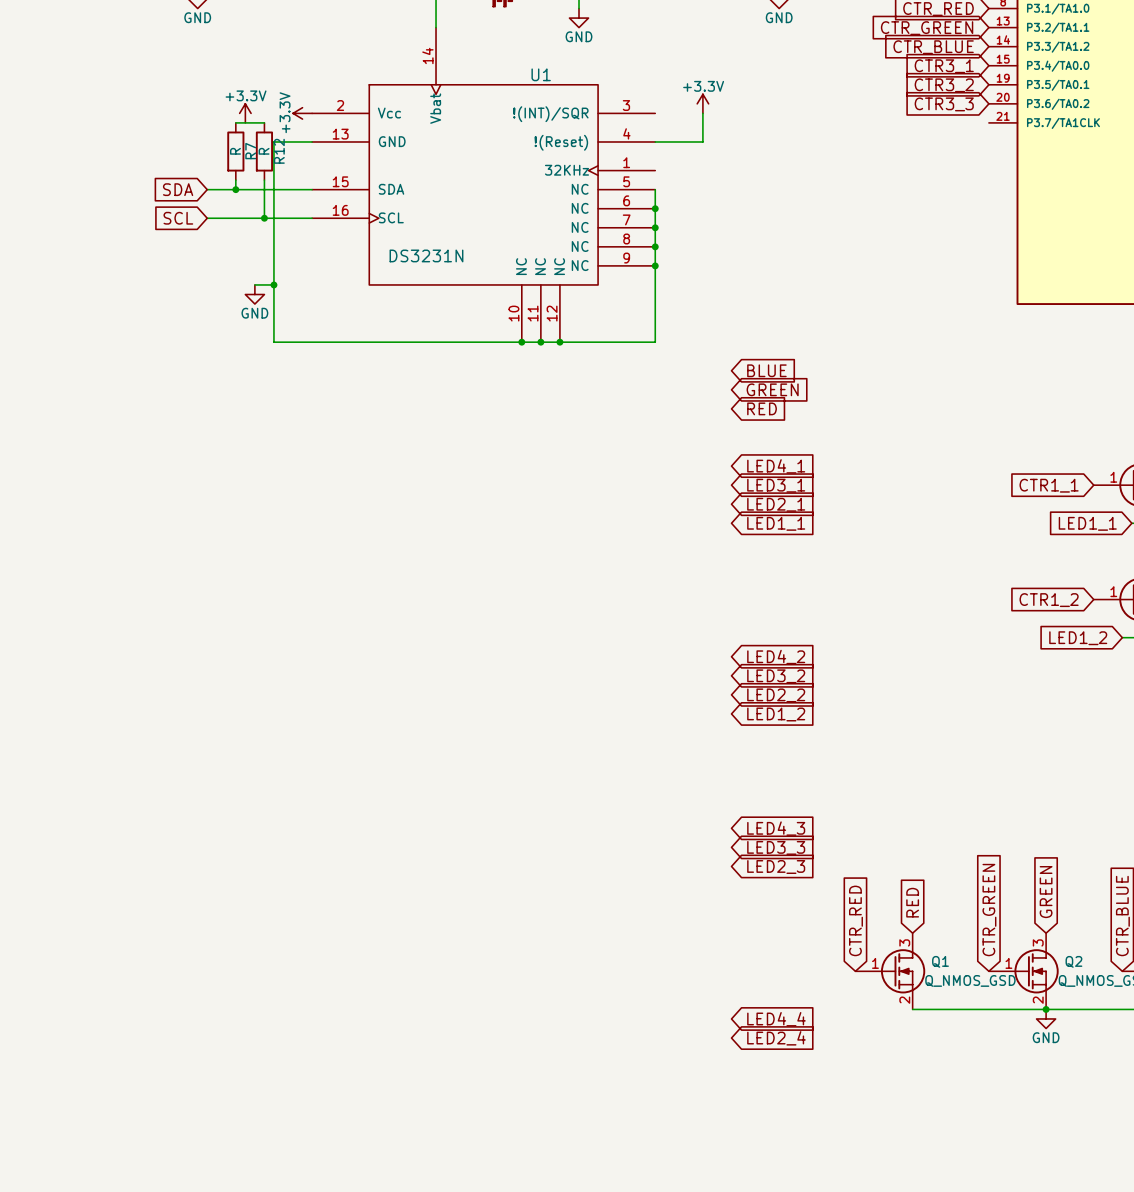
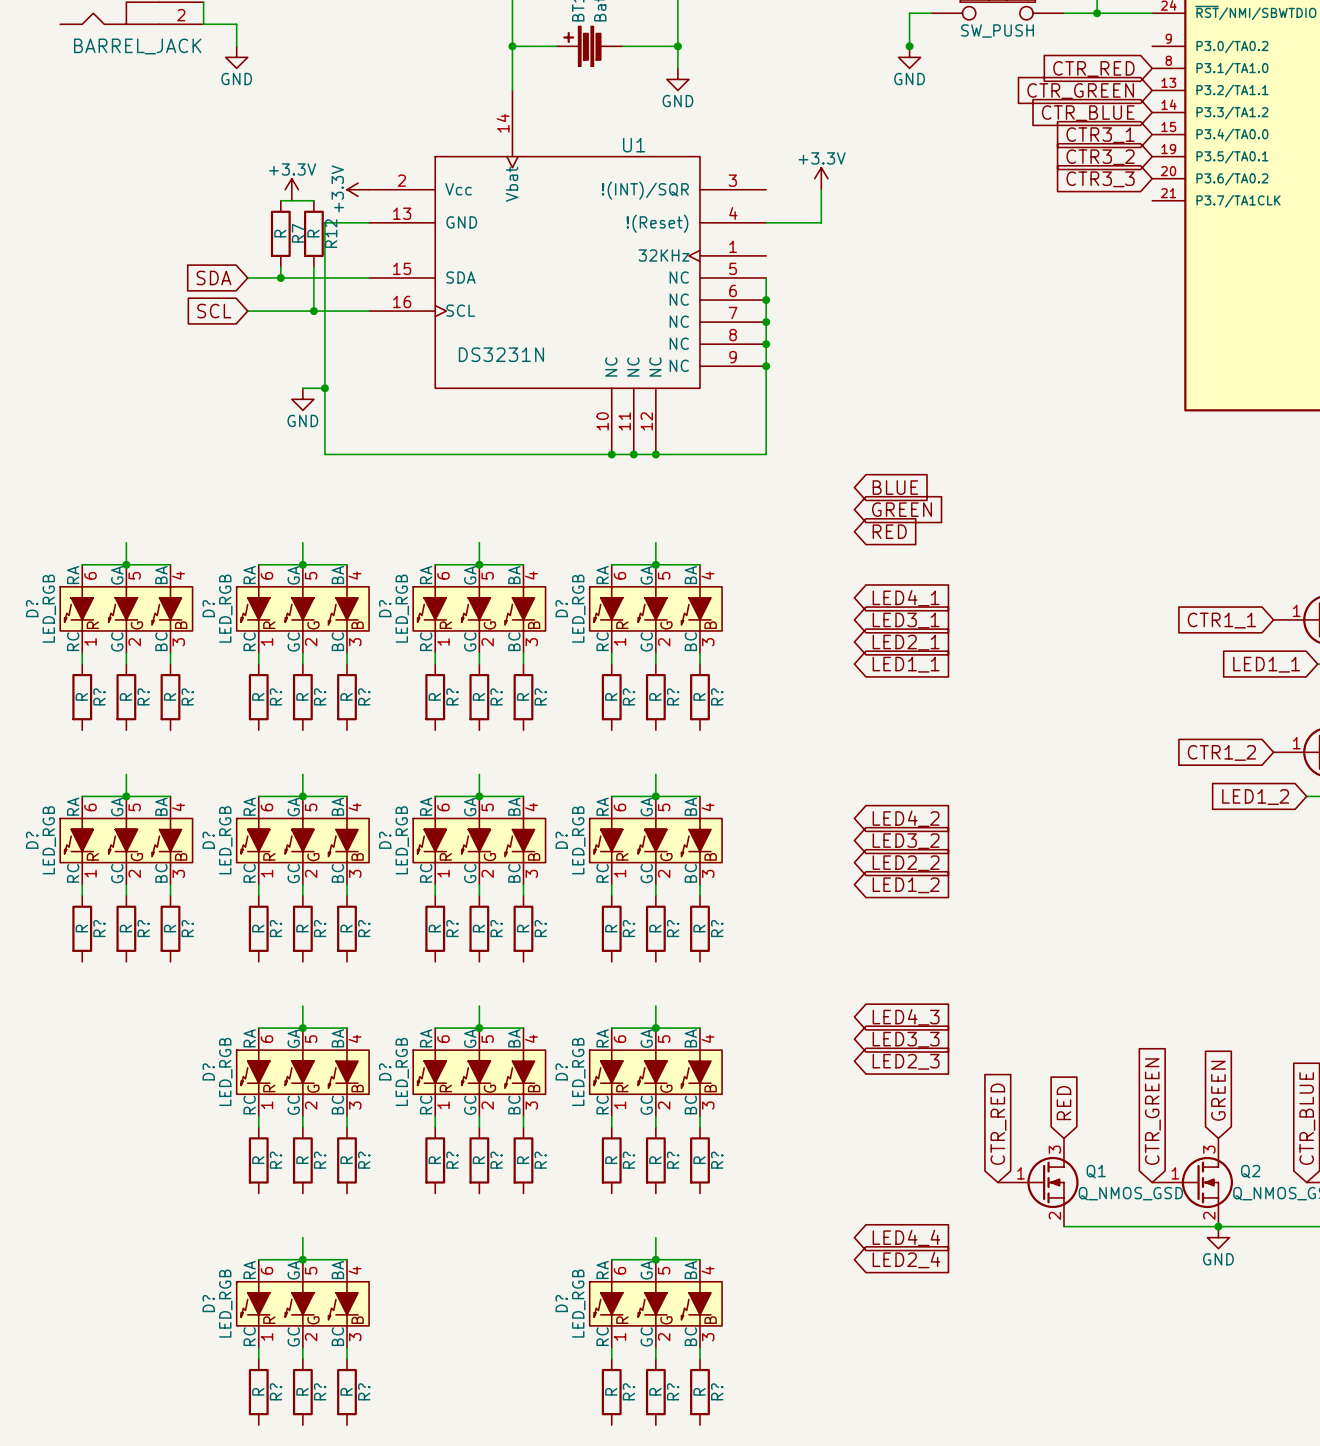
wire: none -> (126, 542) (126, 564)
wire: none -> (302, 542) (302, 564)
wire: none -> (479, 542) (479, 564)
wire: none -> (655, 542) (655, 564)
wire: none -> (82, 564) (170, 564)
junction: none -> (126, 564)
wire: none -> (258, 564) (346, 564)
junction: none -> (302, 564)
wire: none -> (435, 564) (523, 564)
junction: none -> (479, 564)
wire: none -> (611, 564) (699, 564)
junction: none -> (655, 564)
D?: none -> LED_RGB (126, 608)
D?: none -> LED_RGB (302, 608)
D?: none -> LED_RGB (479, 608)
D?: none -> LED_RGB (655, 608)
wire: none -> (82, 653) (82, 664)
wire: none -> (126, 653) (126, 664)
wire: none -> (170, 653) (170, 664)
wire: none -> (258, 653) (258, 664)
wire: none -> (302, 653) (302, 664)
wire: none -> (346, 653) (346, 664)
wire: none -> (435, 653) (435, 664)
wire: none -> (479, 653) (479, 664)
wire: none -> (523, 653) (523, 664)
wire: none -> (611, 653) (611, 664)
wire: none -> (655, 653) (655, 664)
wire: none -> (699, 653) (699, 664)
R?: none -> R (82, 697)
R?: none -> R (126, 697)
R?: none -> R (170, 697)
R?: none -> R (258, 697)
R?: none -> R (302, 697)
R?: none -> R (346, 697)
R?: none -> R (435, 697)
R?: none -> R (479, 697)
R?: none -> R (523, 697)
R?: none -> R (611, 697)
R?: none -> R (655, 697)
R?: none -> R (699, 697)
wire: none -> (126, 774) (126, 796)
wire: none -> (302, 774) (302, 796)
wire: none -> (479, 774) (479, 796)
wire: none -> (655, 774) (655, 796)
wire: none -> (82, 796) (170, 796)
junction: none -> (126, 796)
wire: none -> (258, 796) (346, 796)
junction: none -> (302, 796)
wire: none -> (435, 796) (523, 796)
junction: none -> (479, 796)
wire: none -> (611, 796) (699, 796)
junction: none -> (655, 796)
D?: none -> LED_RGB (126, 840)
D?: none -> LED_RGB (302, 840)
D?: none -> LED_RGB (479, 840)
D?: none -> LED_RGB (655, 840)
wire: none -> (82, 884) (82, 895)
wire: none -> (126, 884) (126, 895)
wire: none -> (170, 884) (170, 895)
wire: none -> (258, 884) (258, 895)
wire: none -> (302, 884) (302, 895)
wire: none -> (346, 884) (346, 895)
wire: none -> (435, 884) (435, 895)
wire: none -> (479, 884) (479, 895)
wire: none -> (523, 884) (523, 895)
wire: none -> (611, 884) (611, 895)
wire: none -> (655, 884) (655, 895)
wire: none -> (699, 884) (699, 895)
R?: none -> R (82, 928)
R?: none -> R (126, 928)
R?: none -> R (170, 928)
R?: none -> R (258, 928)
R?: none -> R (302, 928)
R?: none -> R (346, 928)
R?: none -> R (435, 928)
R?: none -> R (479, 928)
R?: none -> R (523, 928)
R?: none -> R (611, 928)
R?: none -> R (655, 928)
R?: none -> R (699, 928)
wire: none -> (302, 1006) (302, 1028)
wire: none -> (479, 1006) (479, 1028)
wire: none -> (655, 1006) (655, 1028)
wire: none -> (258, 1028) (346, 1028)
junction: none -> (302, 1028)
wire: none -> (435, 1028) (523, 1028)
junction: none -> (479, 1028)
wire: none -> (611, 1028) (699, 1028)
junction: none -> (655, 1028)
D?: none -> LED_RGB (302, 1072)
D?: none -> LED_RGB (479, 1072)
D?: none -> LED_RGB (655, 1072)
wire: none -> (258, 1116) (258, 1127)
wire: none -> (302, 1116) (302, 1127)
wire: none -> (346, 1116) (346, 1127)
wire: none -> (435, 1116) (435, 1127)
wire: none -> (479, 1116) (479, 1127)
wire: none -> (523, 1116) (523, 1127)
wire: none -> (611, 1116) (611, 1127)
wire: none -> (655, 1116) (655, 1127)
wire: none -> (699, 1116) (699, 1127)
R?: none -> R (258, 1160)
R?: none -> R (302, 1160)
R?: none -> R (346, 1160)
R?: none -> R (435, 1160)
R?: none -> R (479, 1160)
R?: none -> R (523, 1160)
R?: none -> R (611, 1160)
R?: none -> R (655, 1160)
R?: none -> R (699, 1160)
wire: none -> (302, 1237) (302, 1259)
wire: none -> (655, 1237) (655, 1259)
wire: none -> (258, 1259) (346, 1259)
junction: none -> (302, 1259)
wire: none -> (611, 1259) (699, 1259)
junction: none -> (655, 1259)
D?: none -> LED_RGB (302, 1303)
D?: none -> LED_RGB (655, 1303)
wire: none -> (258, 1347) (258, 1358)
wire: none -> (302, 1347) (302, 1358)
wire: none -> (346, 1347) (346, 1358)
wire: none -> (611, 1347) (611, 1358)
wire: none -> (655, 1347) (655, 1358)
wire: none -> (699, 1347) (699, 1358)
R?: none -> R (258, 1392)
R?: none -> R (302, 1392)
R?: none -> R (346, 1392)
R?: none -> R (611, 1392)
R?: none -> R (655, 1392)
R?: none -> R (699, 1392)

